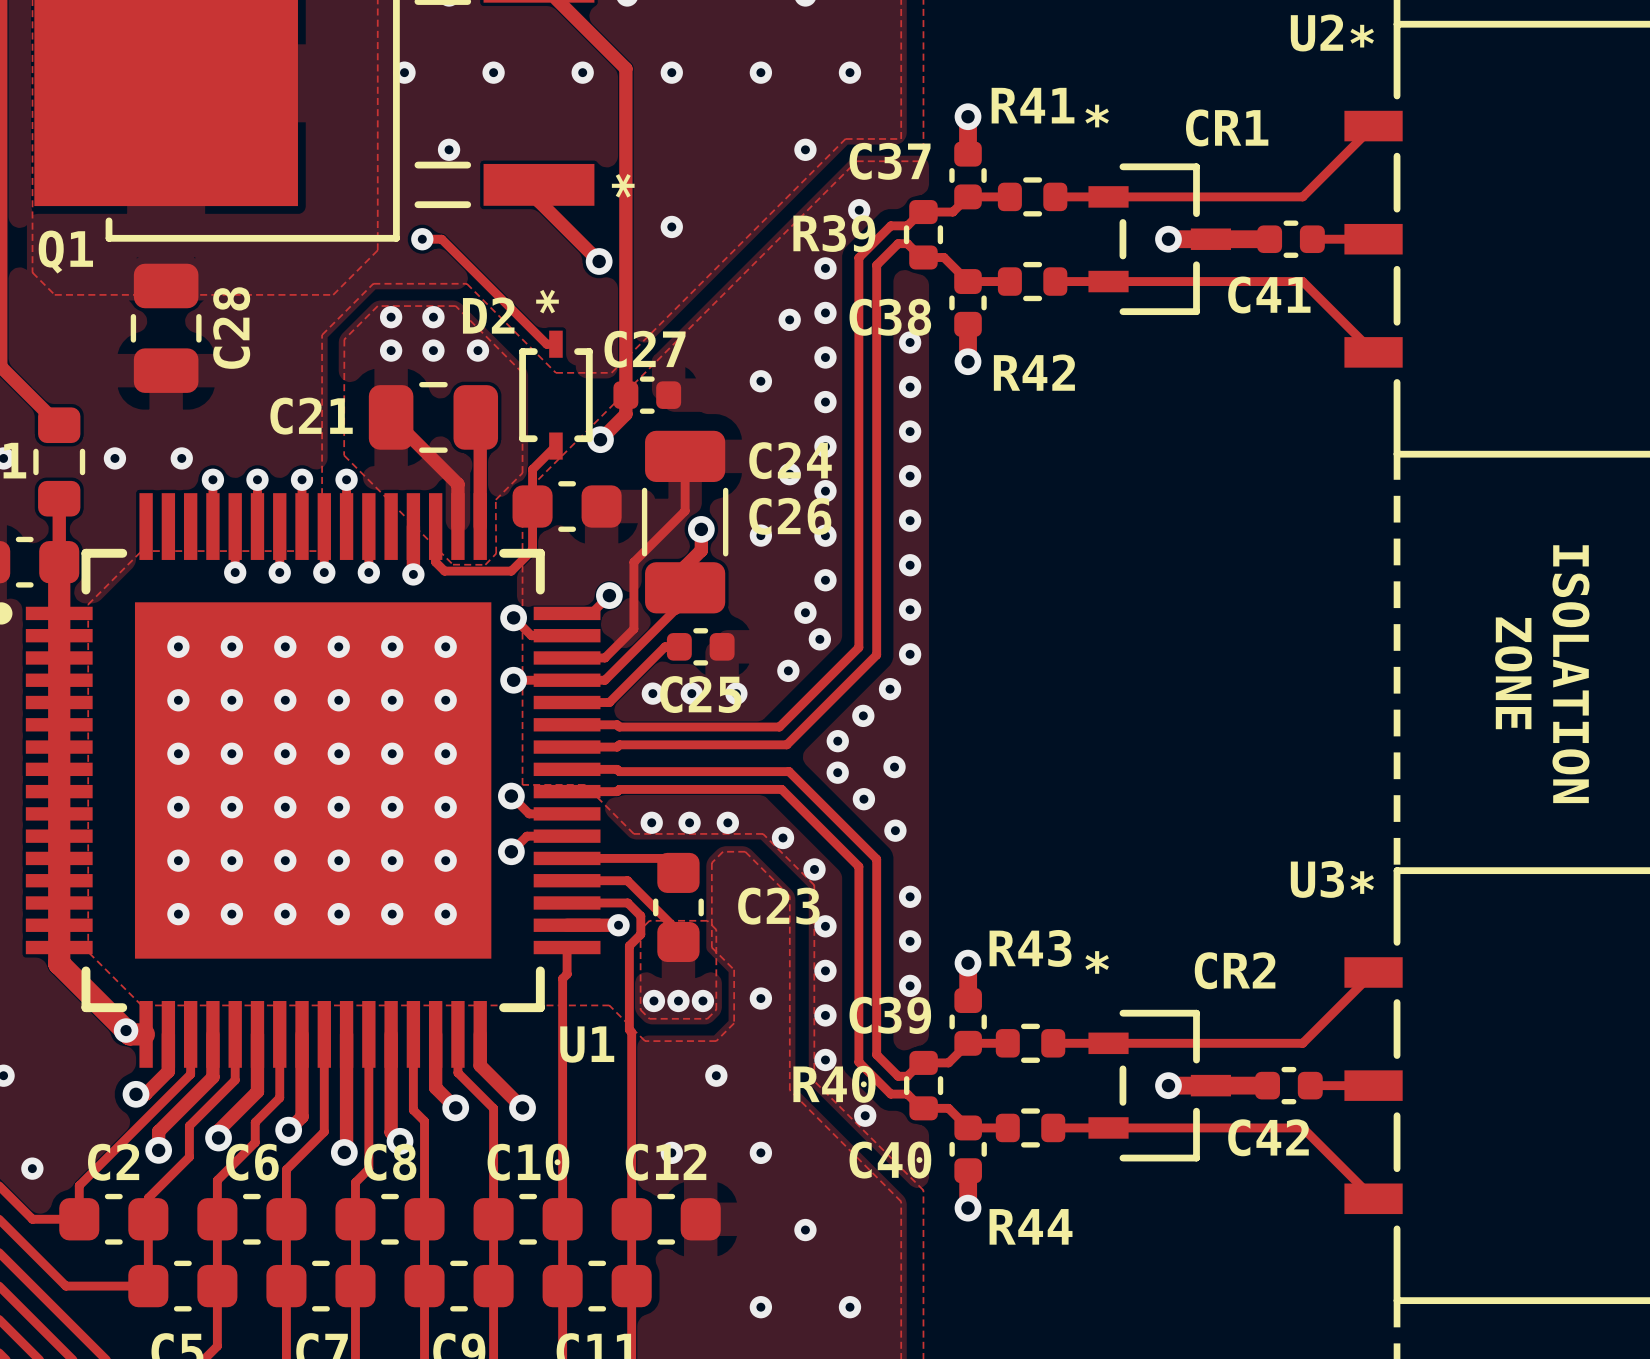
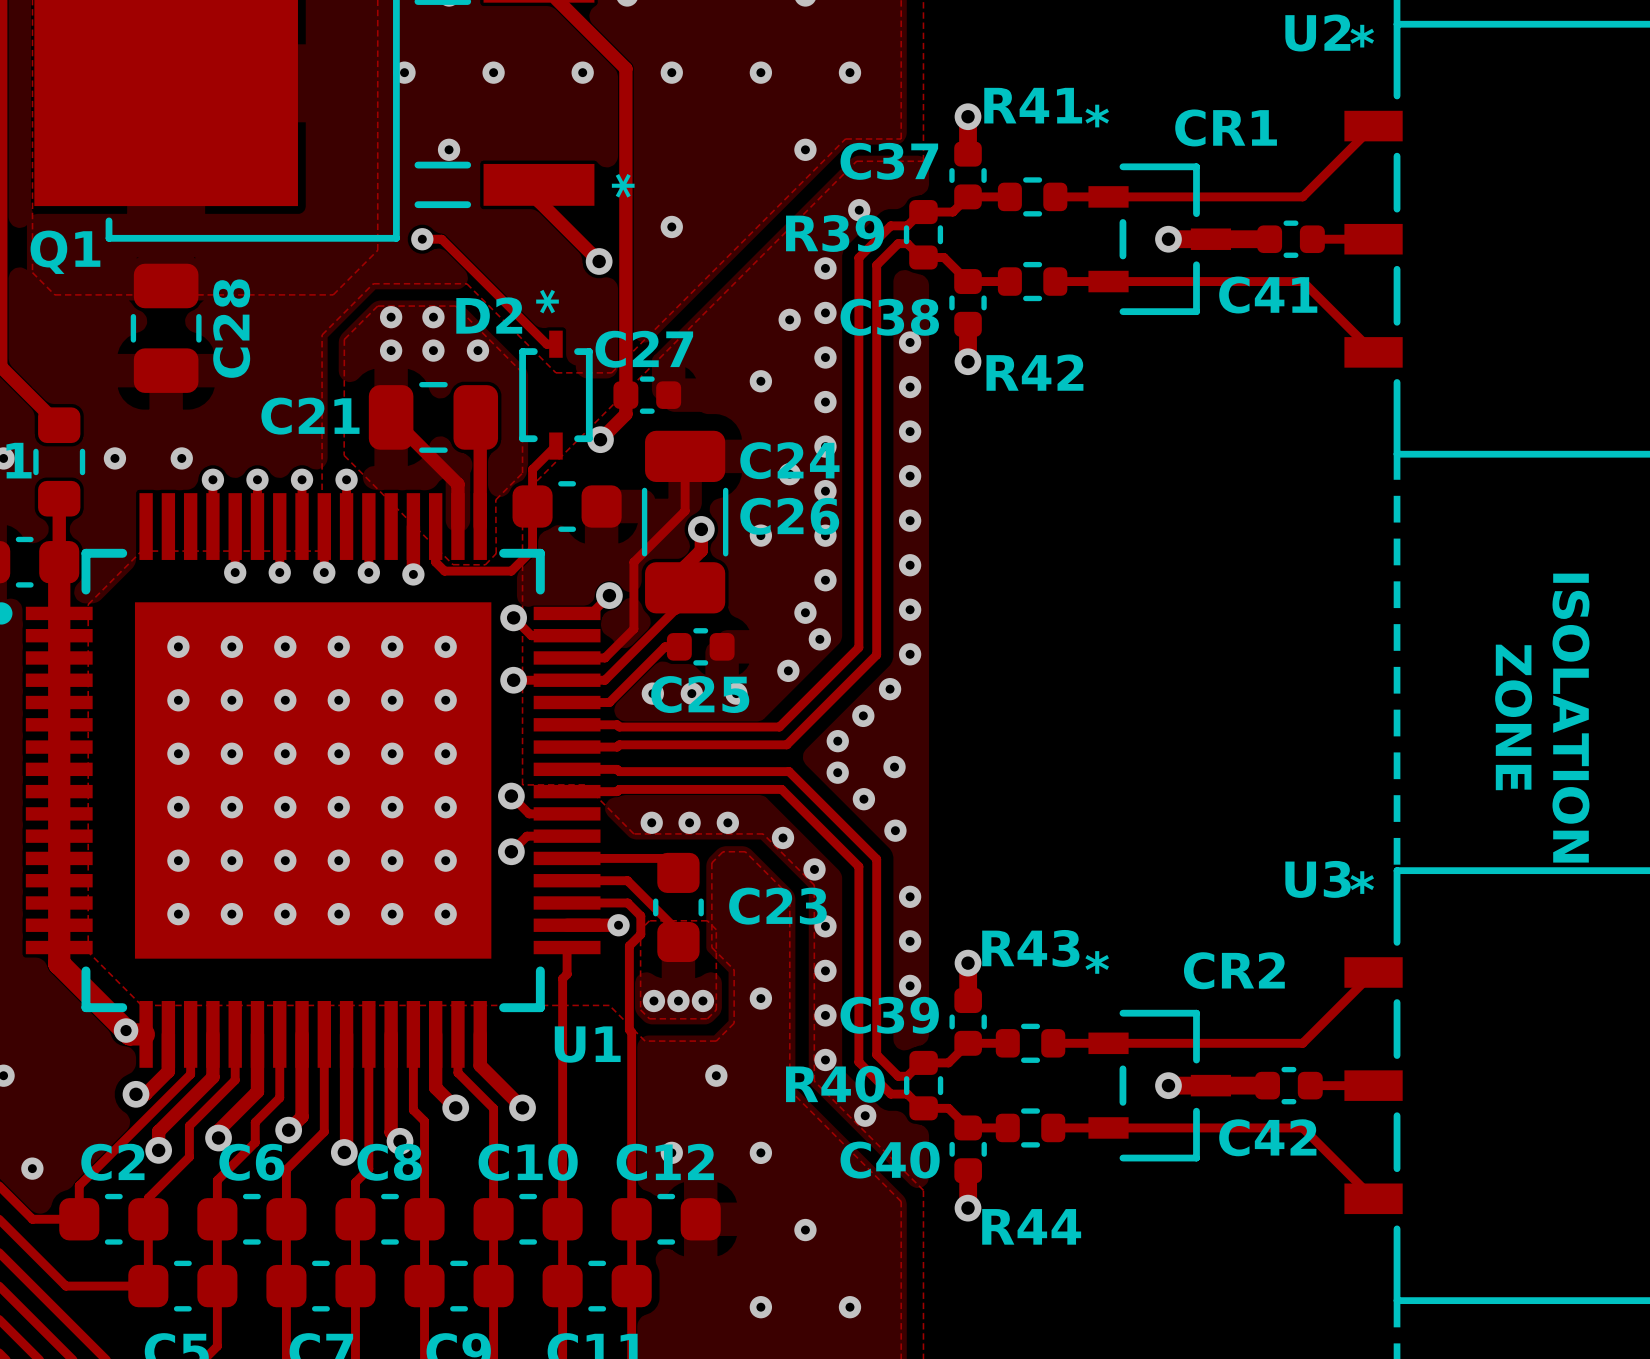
text position: ZONE (1513, 673) -> ZONE (1513, 717)
text position: ISOLATION (1570, 674) -> ISOLATION (1570, 718)

